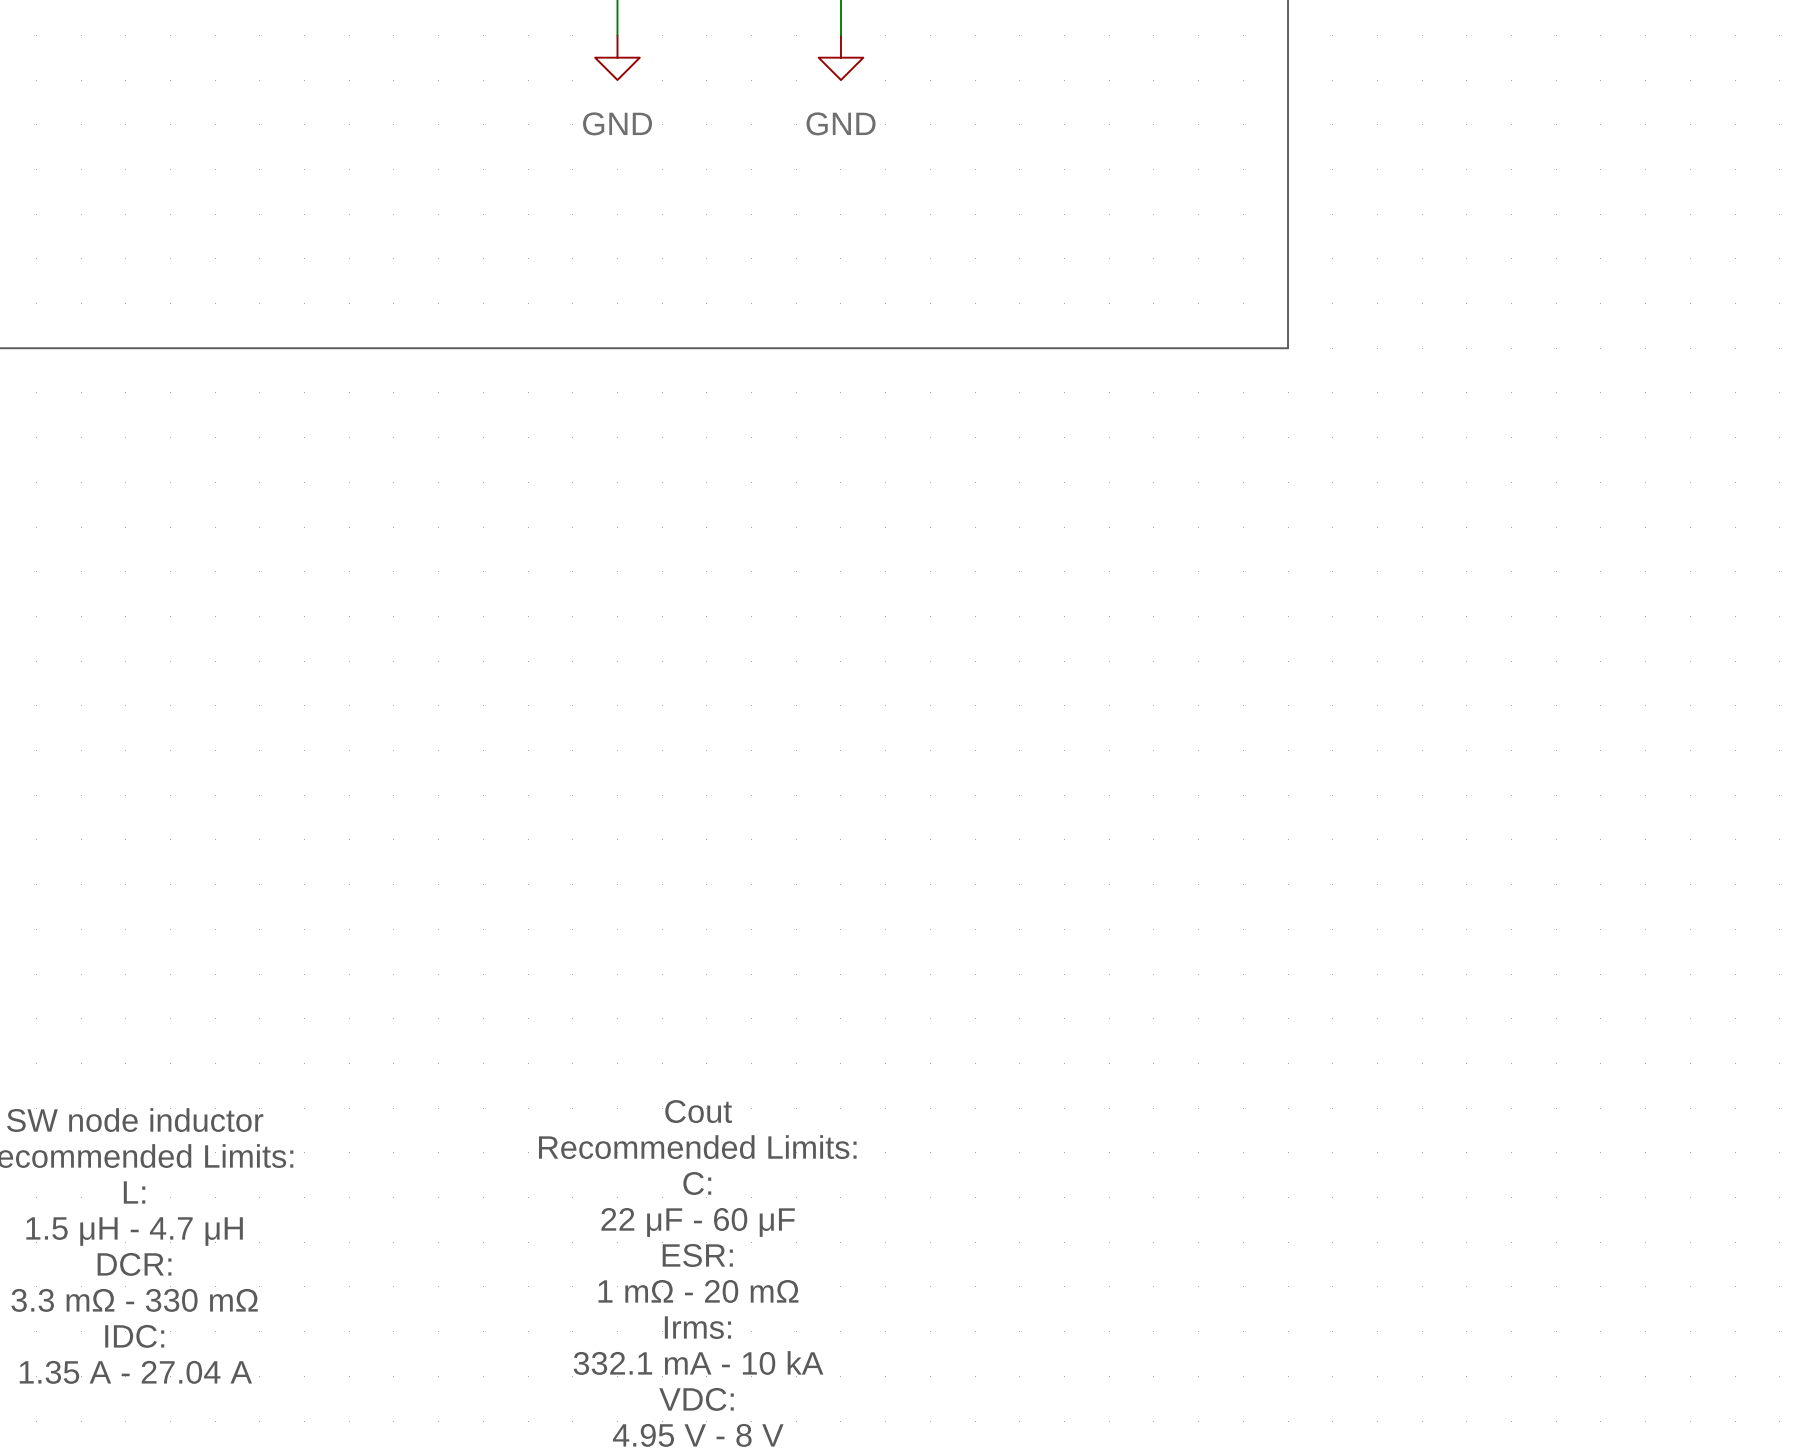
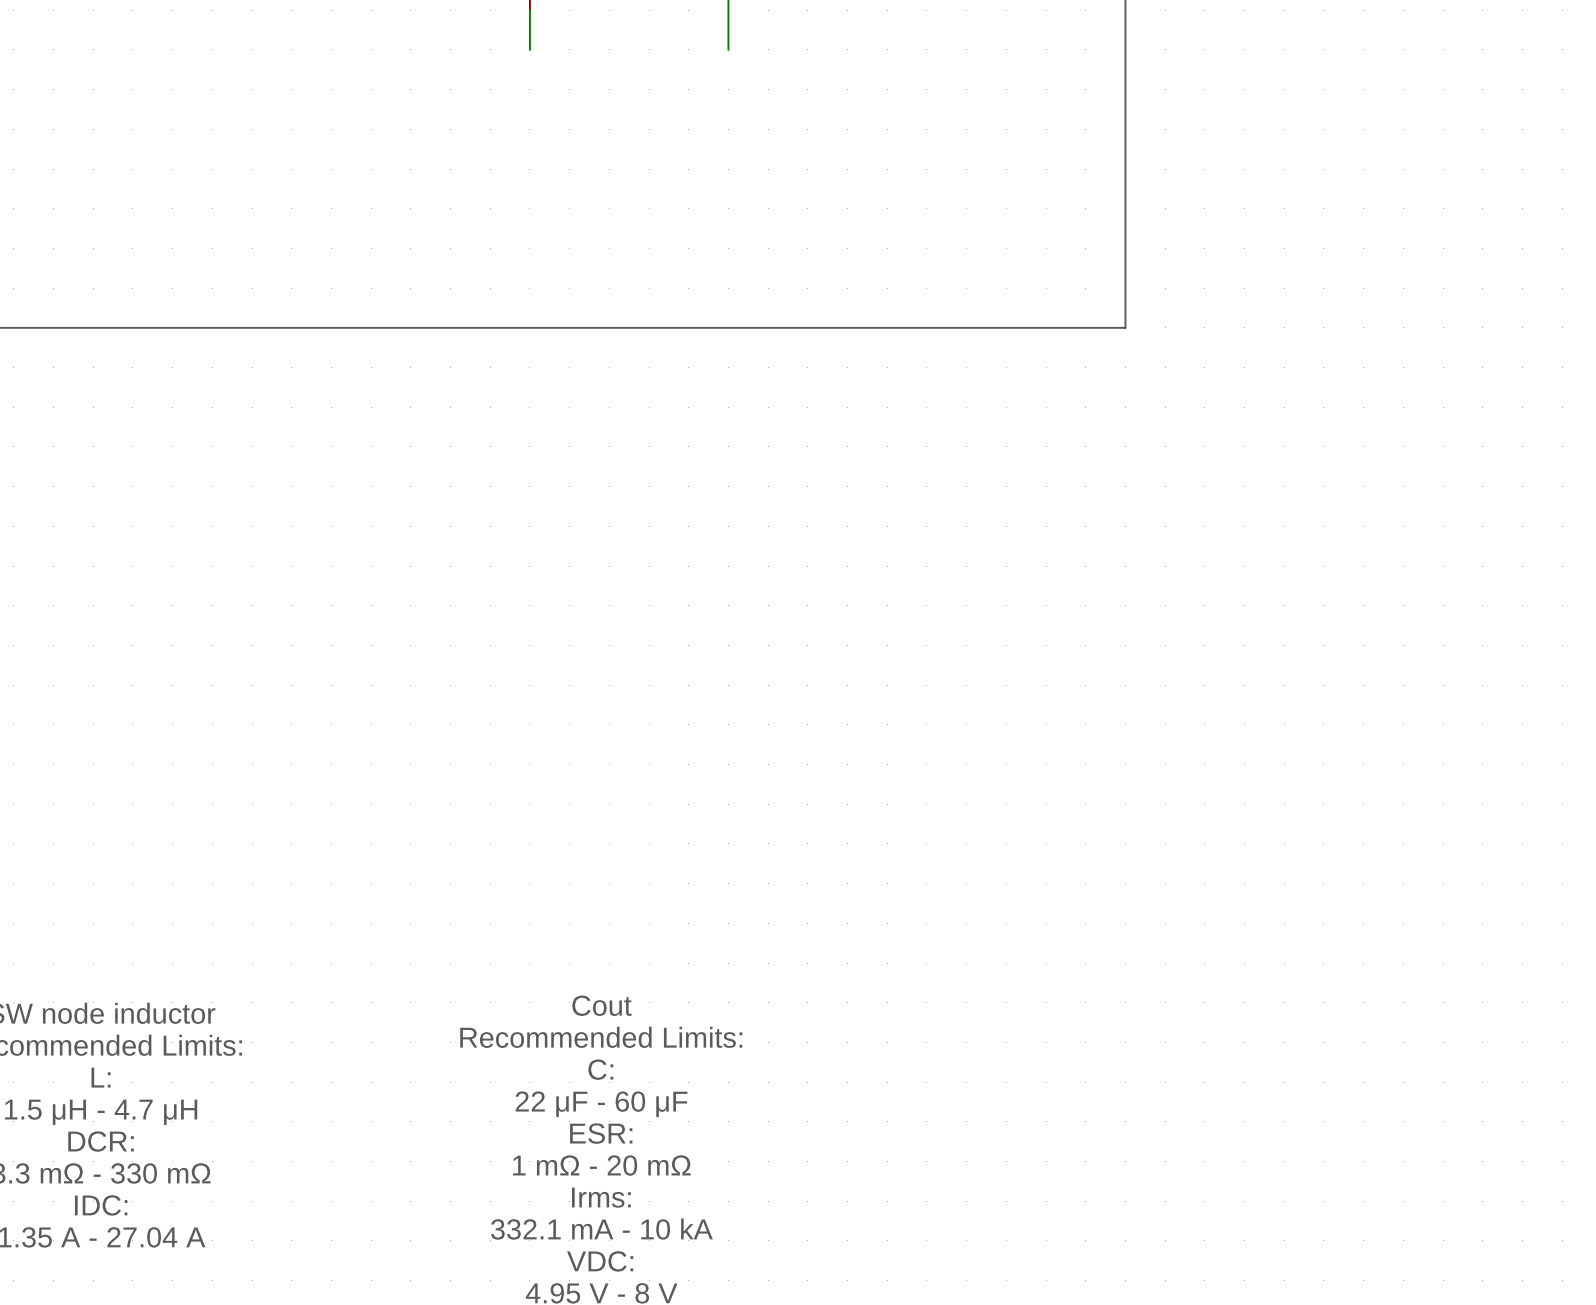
power symbol: GND (617, 57) -> none
power symbol: GND (840, 57) -> none

